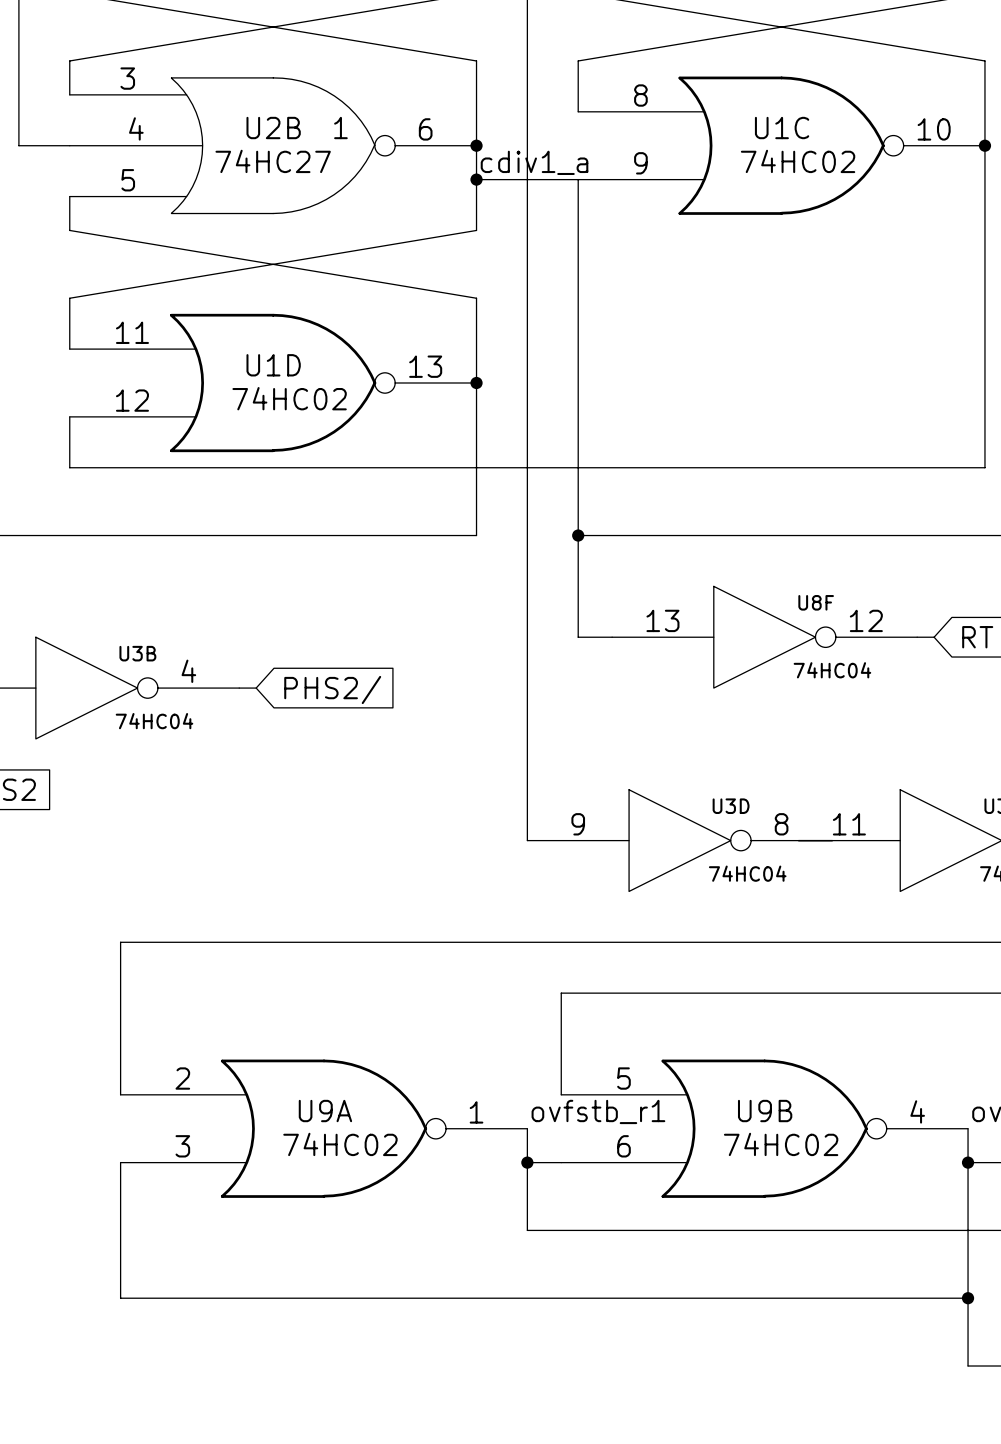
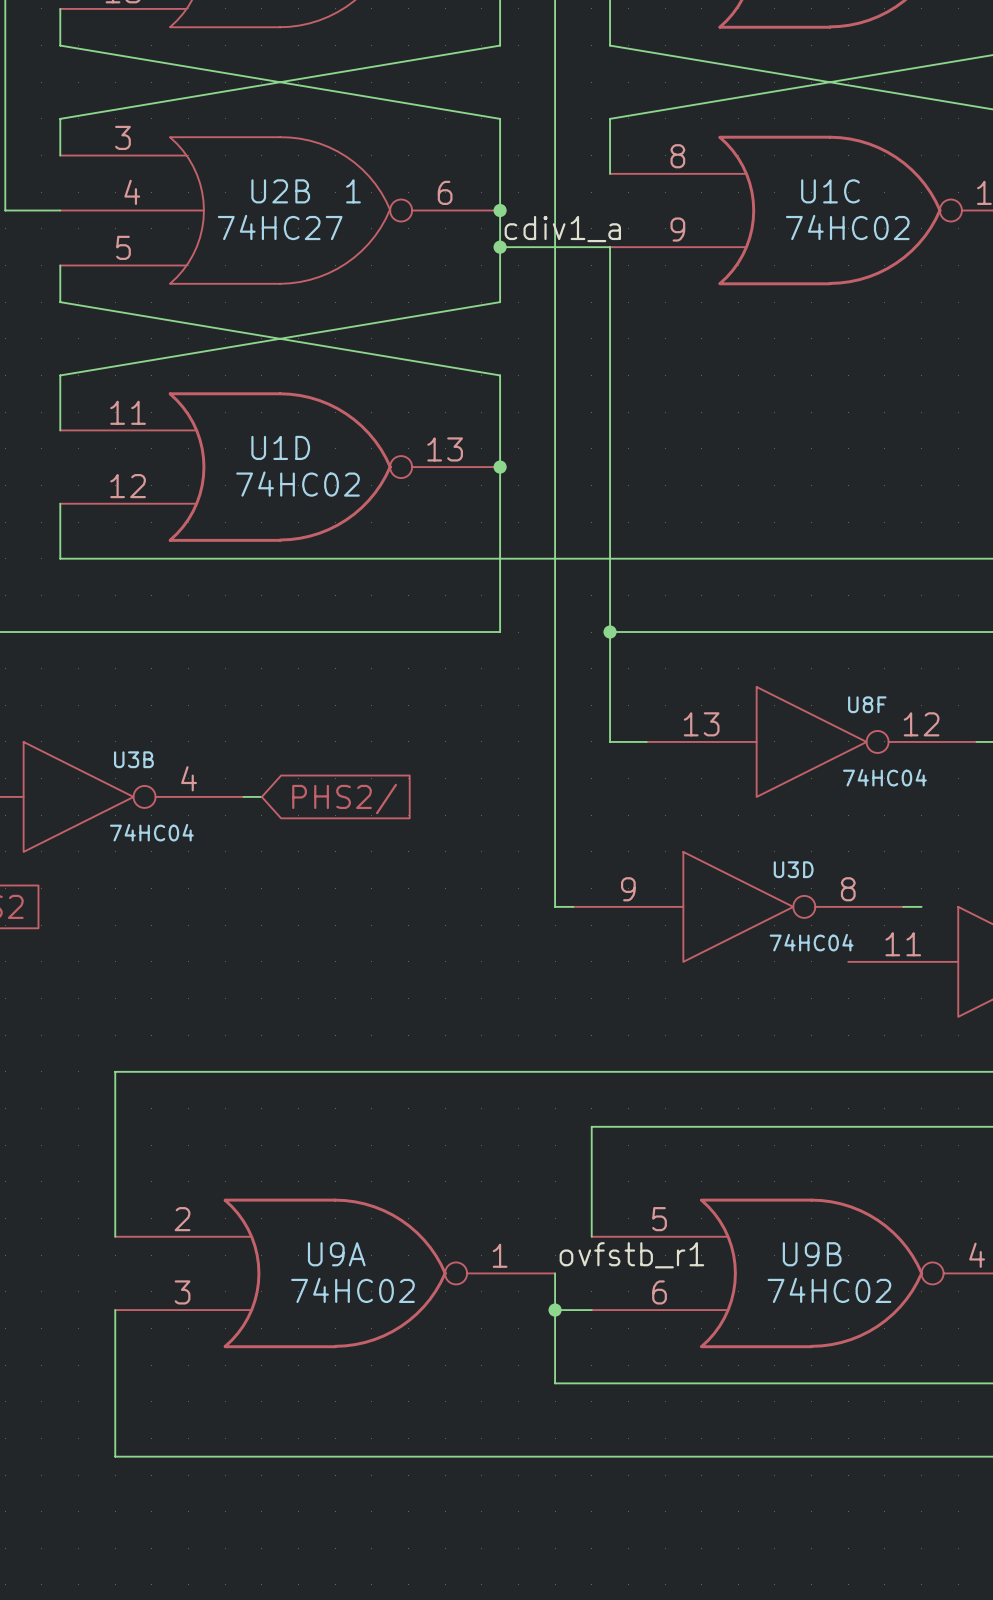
wire: (527, 789) (527, 840) -> (555, 906) (573, 906)
wire: none -> (903, 906) (921, 906)
U3D position: (679, 840) -> (738, 906)

